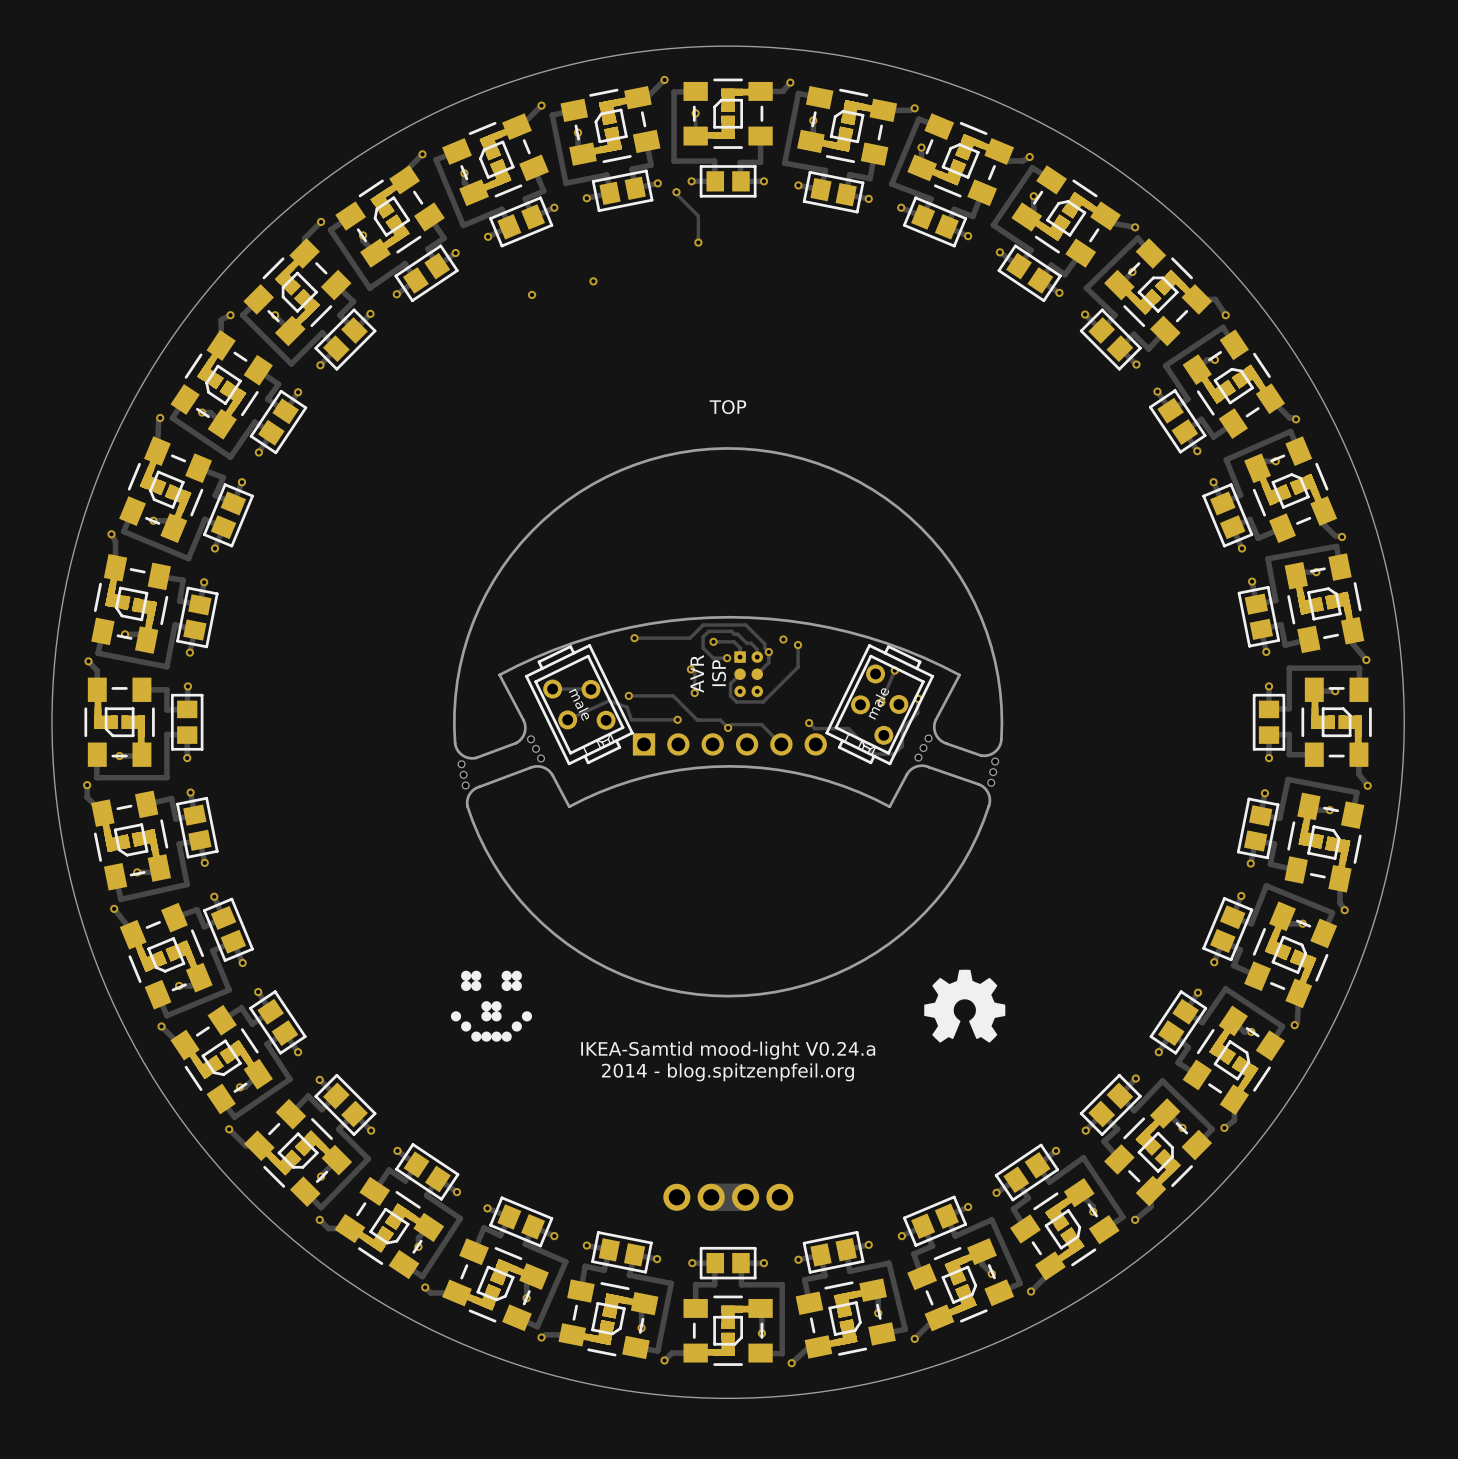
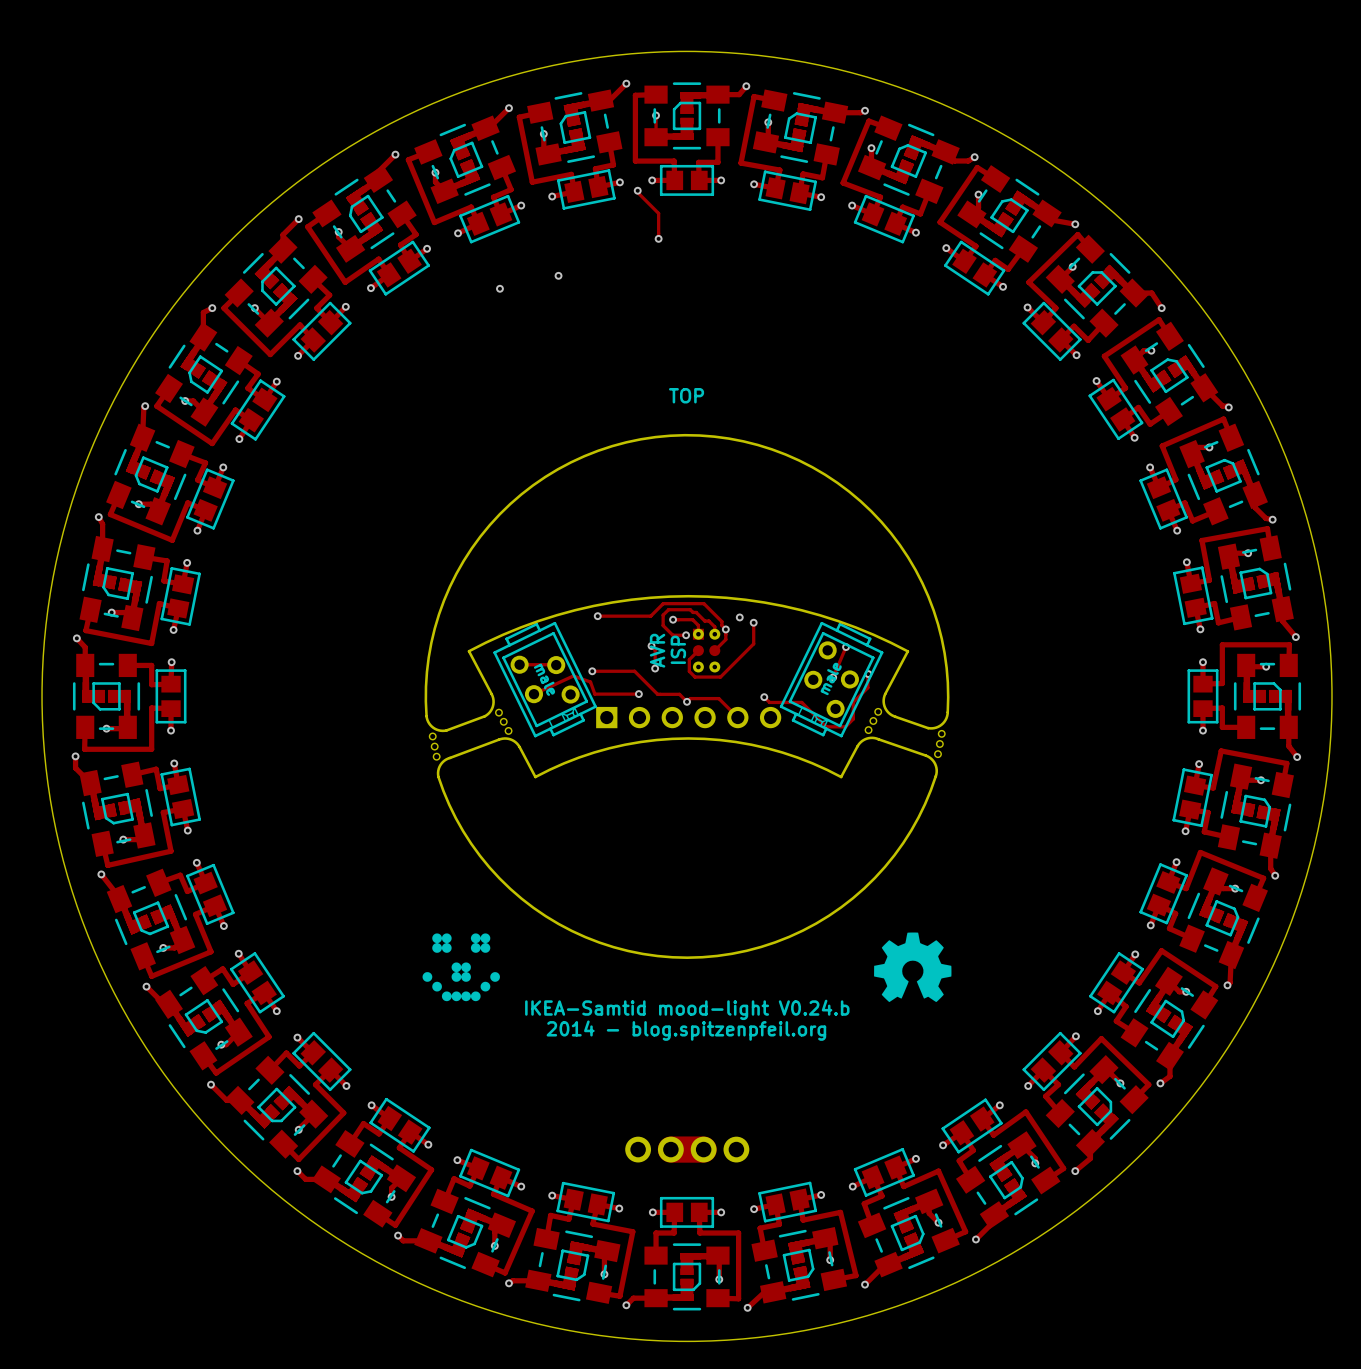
text: IKEA-Samtid mood-light V0.24.a (728, 1050) -> IKEA-Samtid mood-light V0.24.b (687, 1009)

